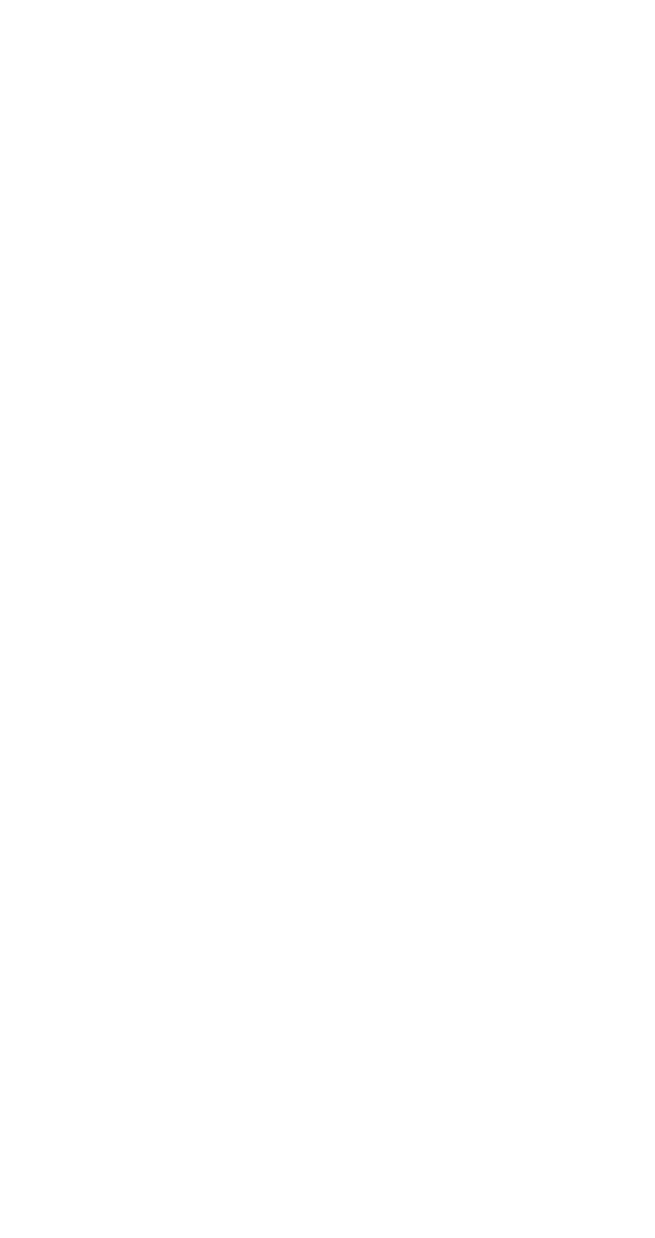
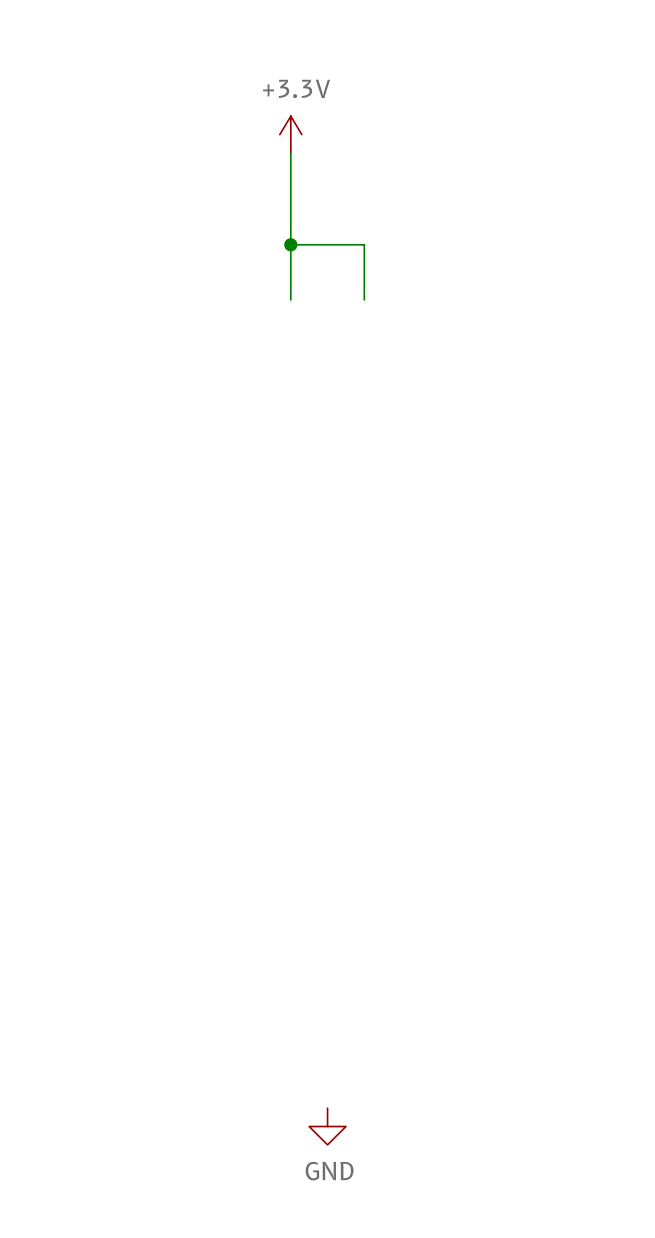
power symbol: none -> +3.3V (290, 134)
wire: none -> (290, 152) (290, 299)
wire: none -> (290, 244) (364, 244) (364, 299)
junction: none -> (290, 244)
power symbol: none -> GND (327, 1126)

